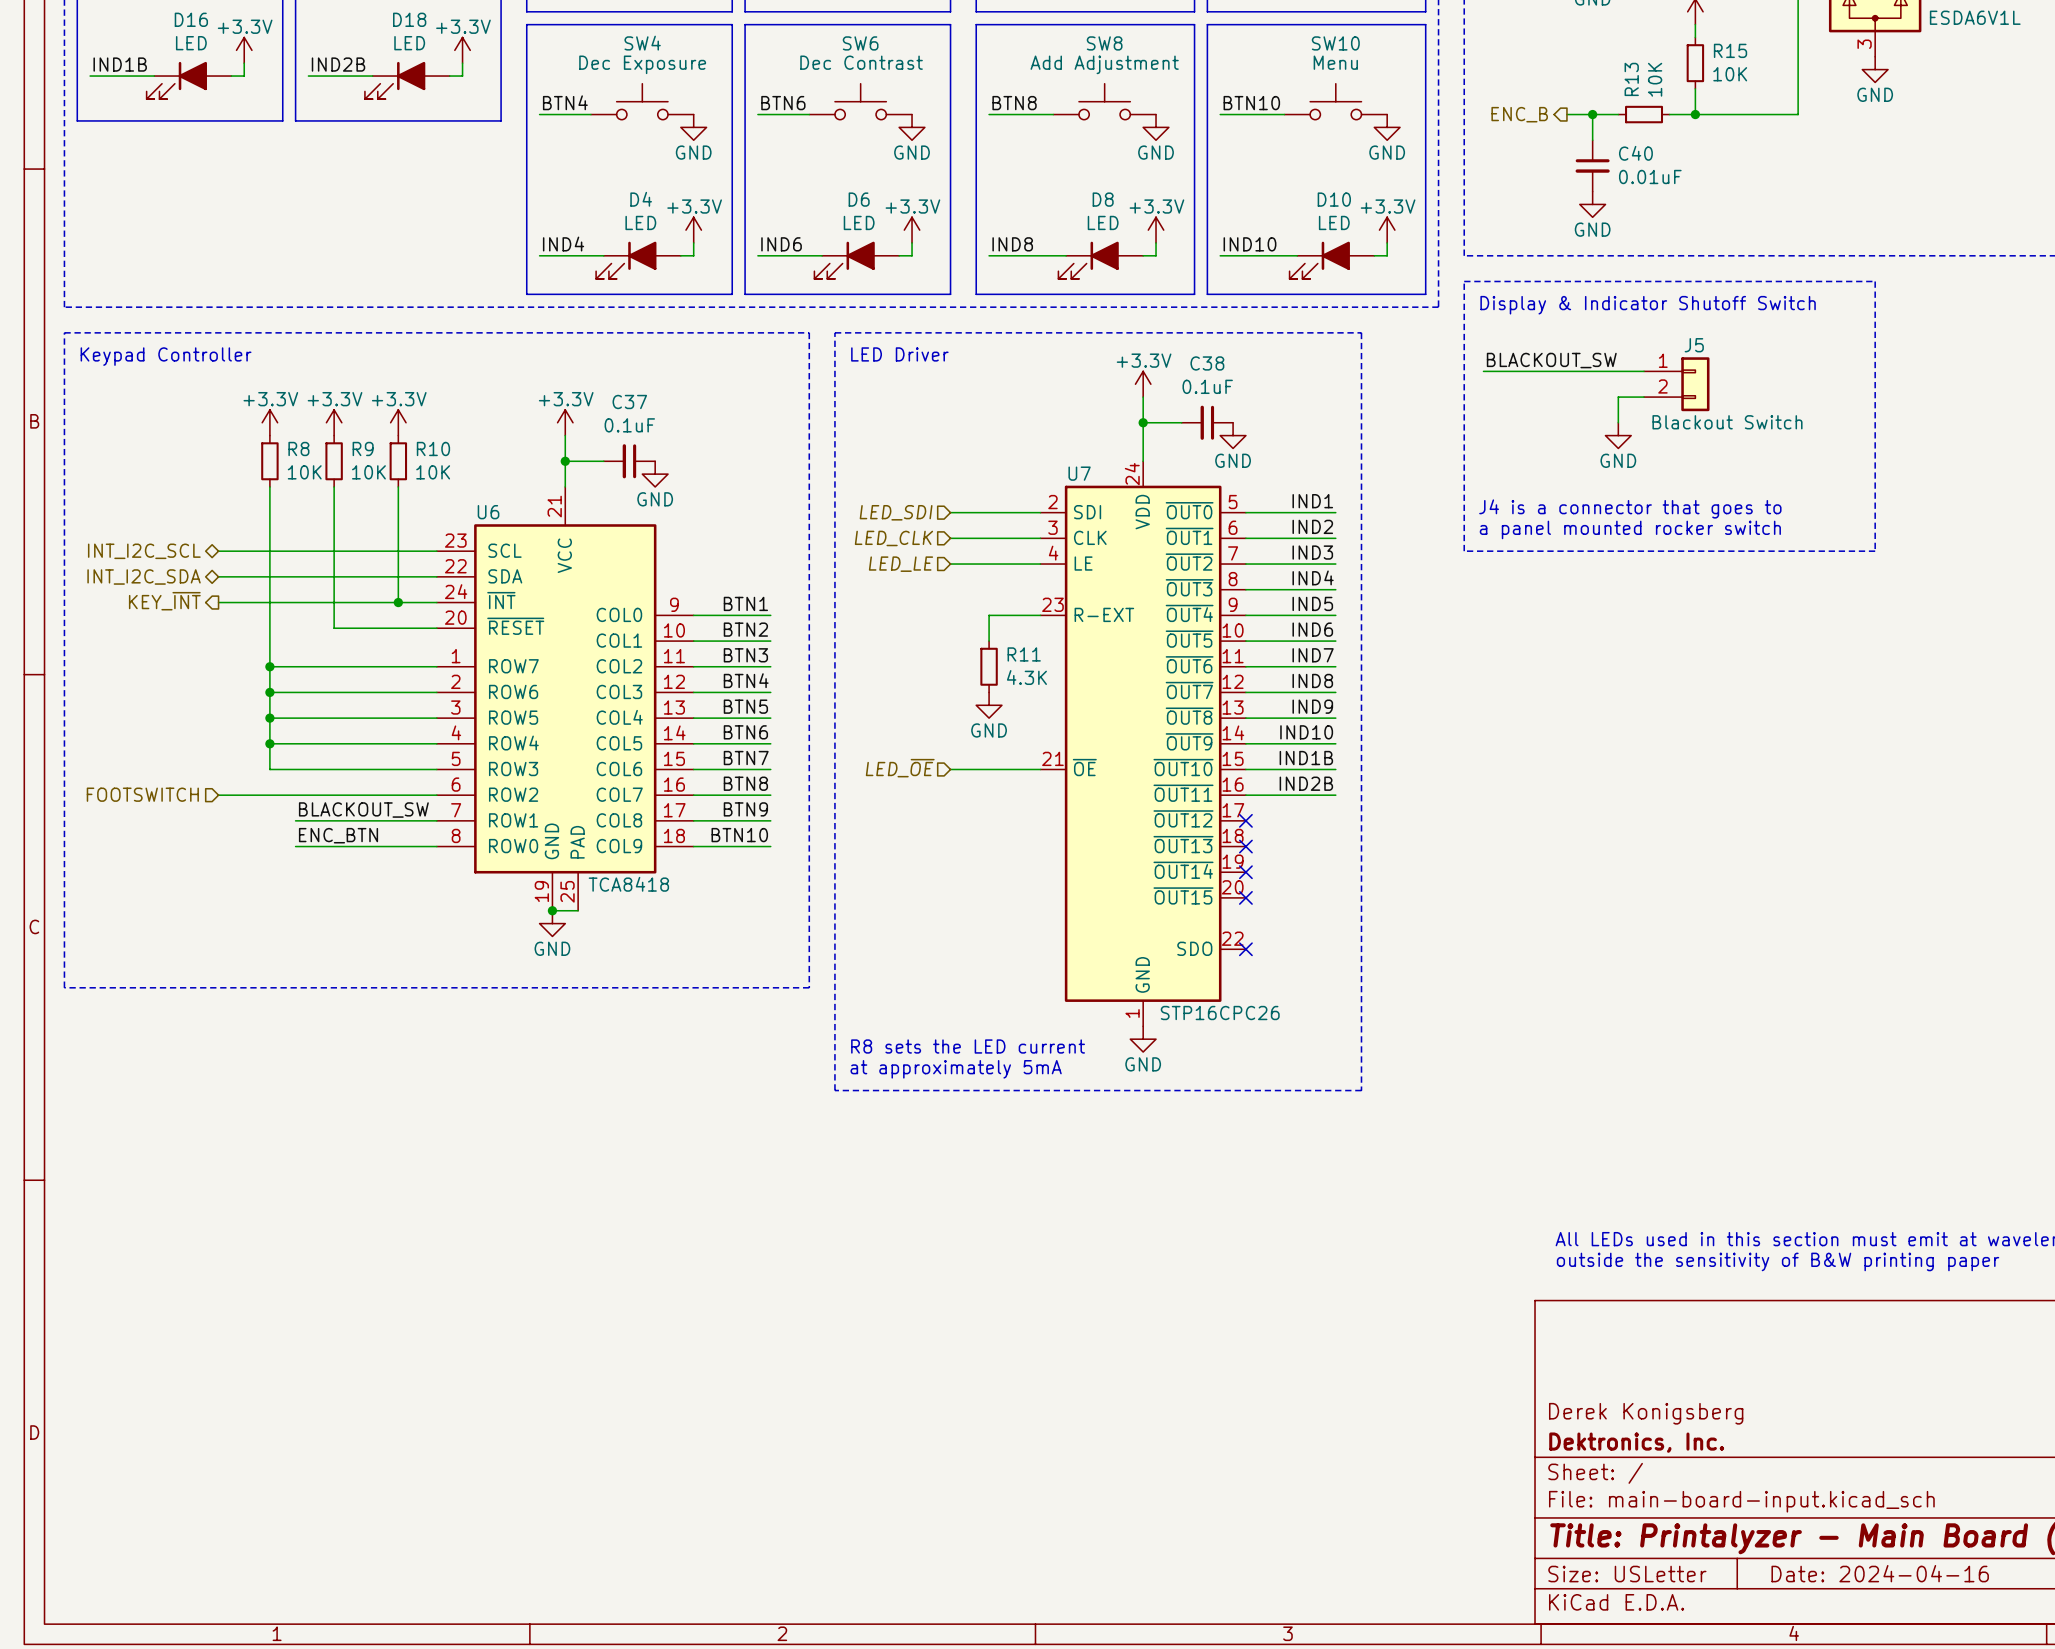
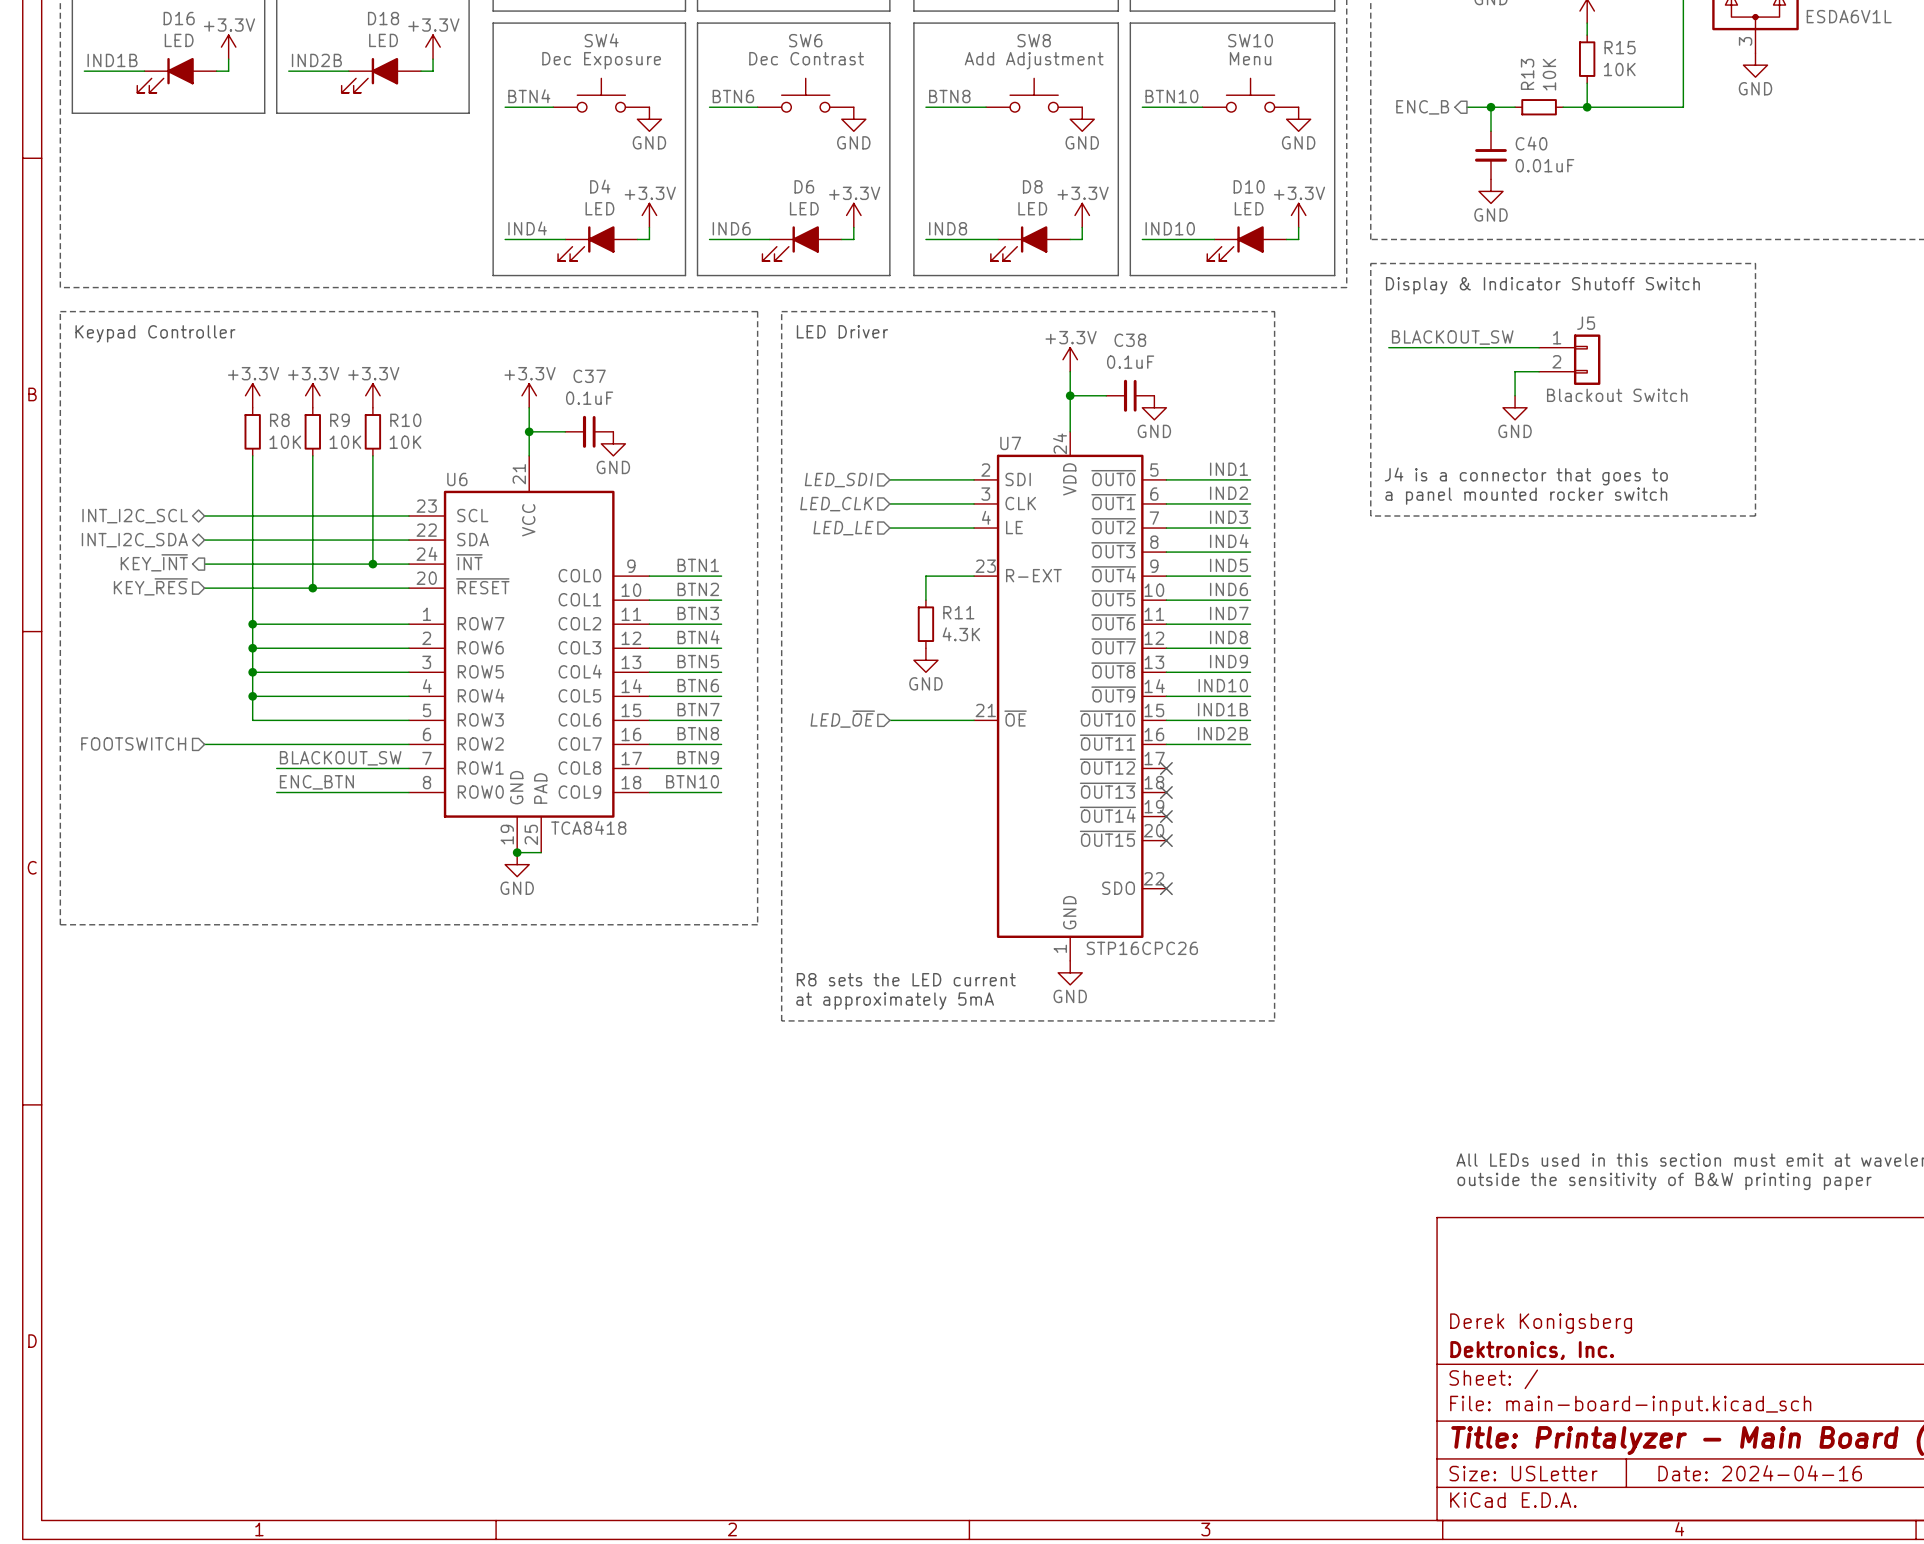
hierarchical label: none -> KEY_~{RES} (150, 586)
wire: none -> (204, 588) (312, 588)
junction: none -> (312, 588)

